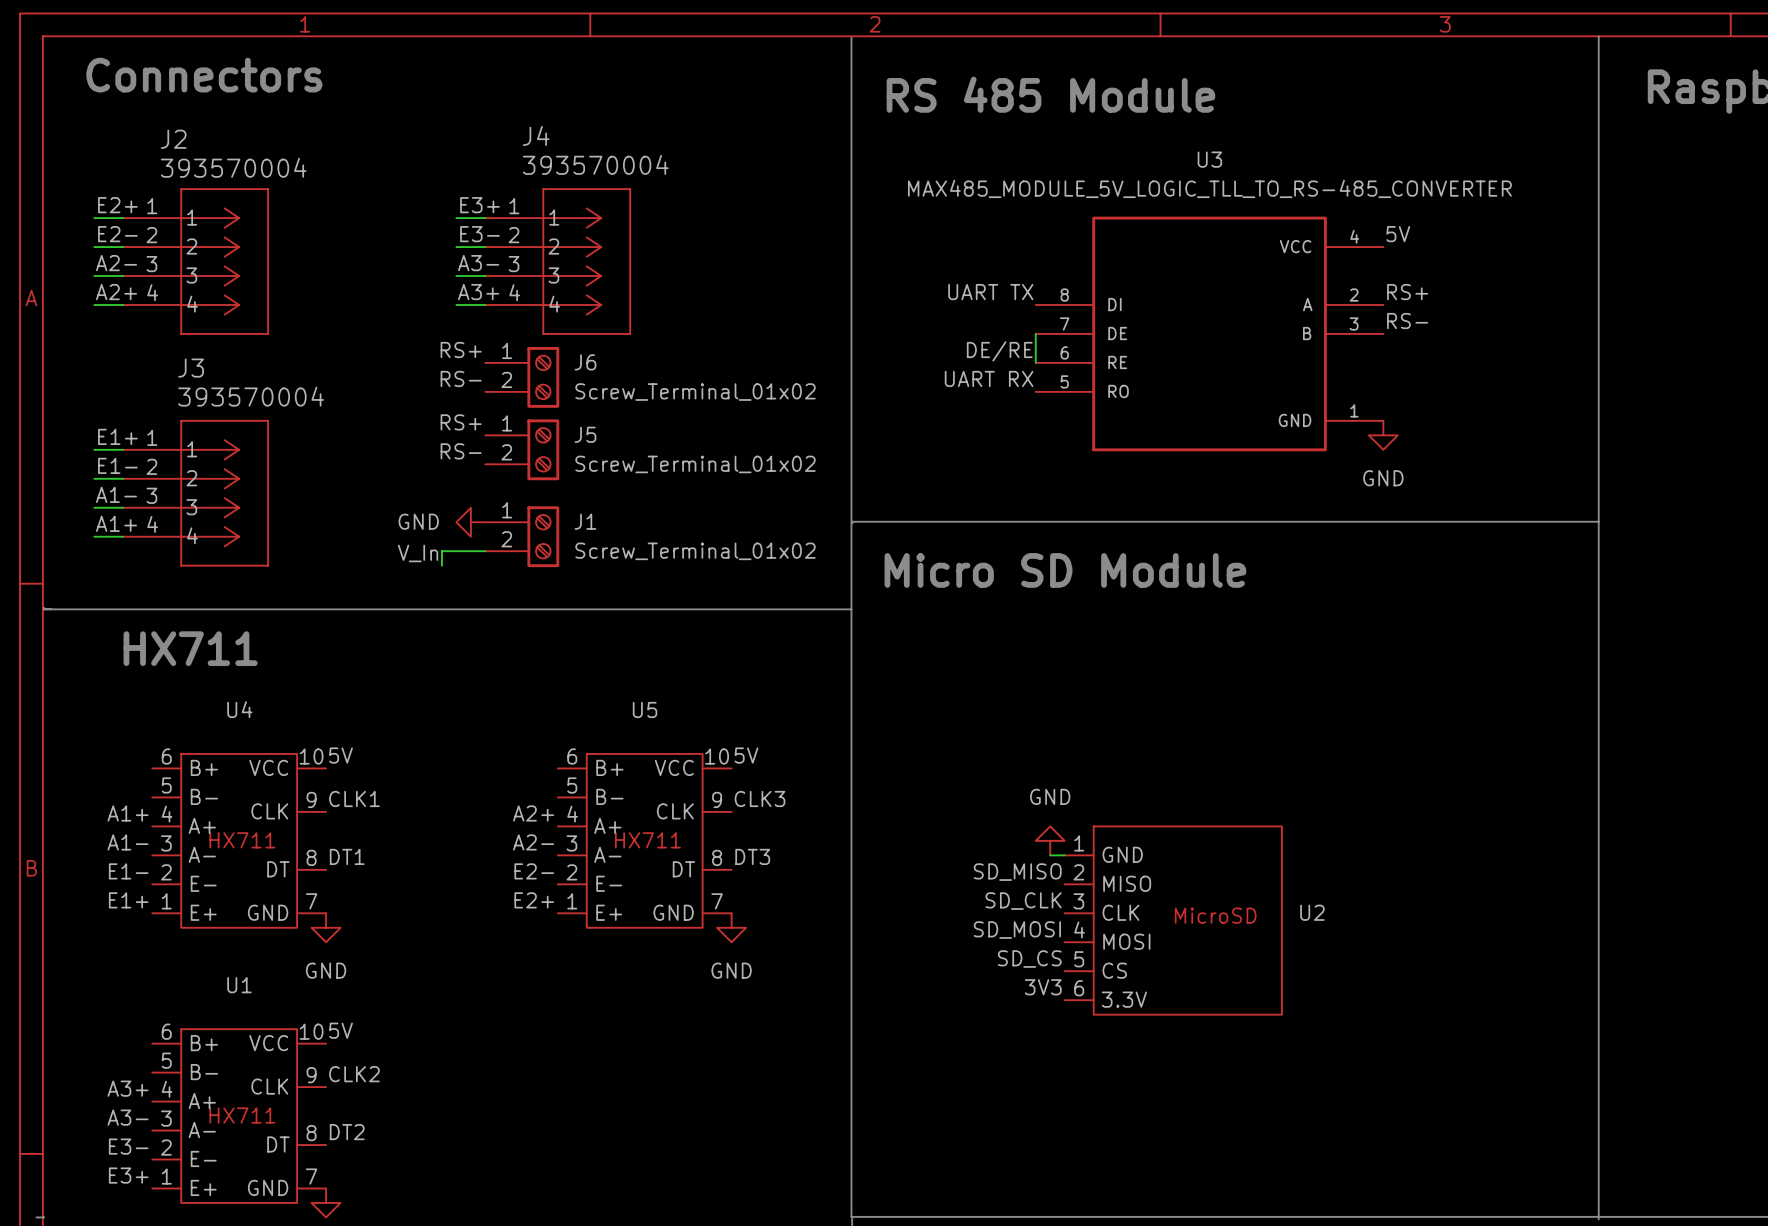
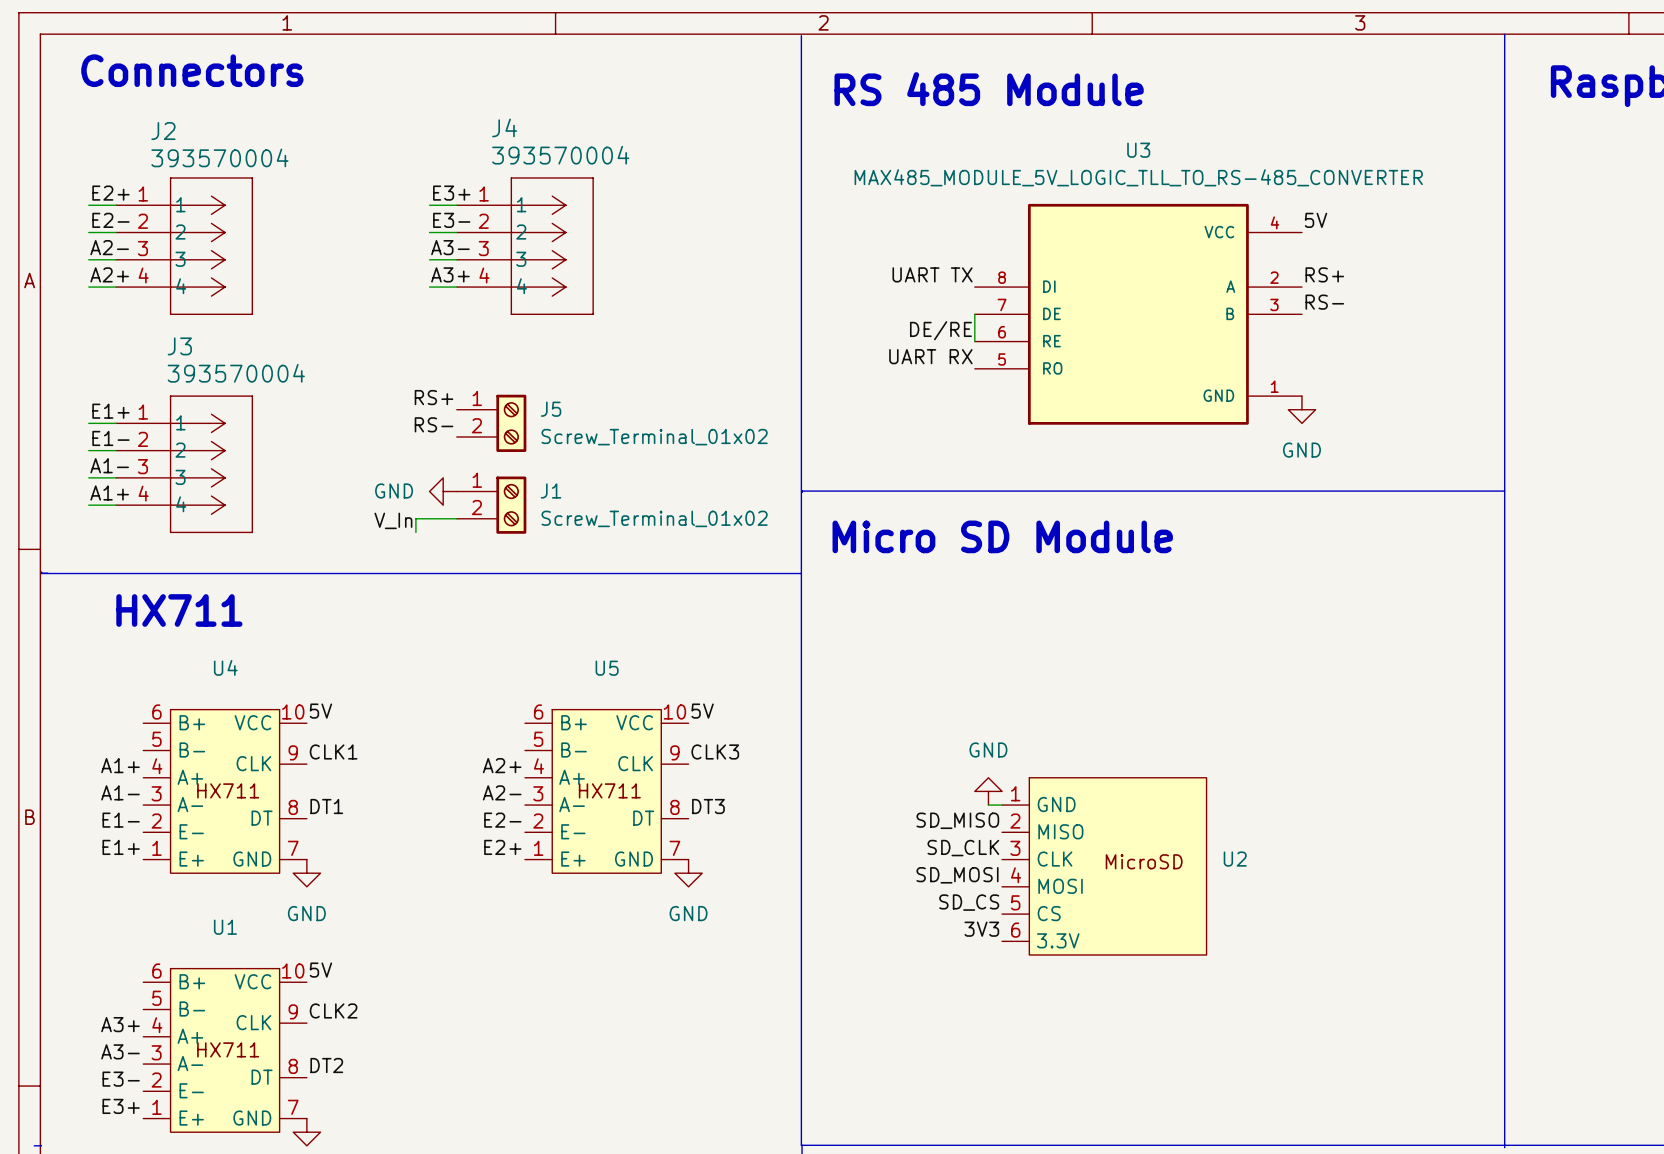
label: RS+ (461, 350) -> none
J6: Screw_Terminal_01x02 (522, 377) -> none
label: RS- (461, 378) -> none

